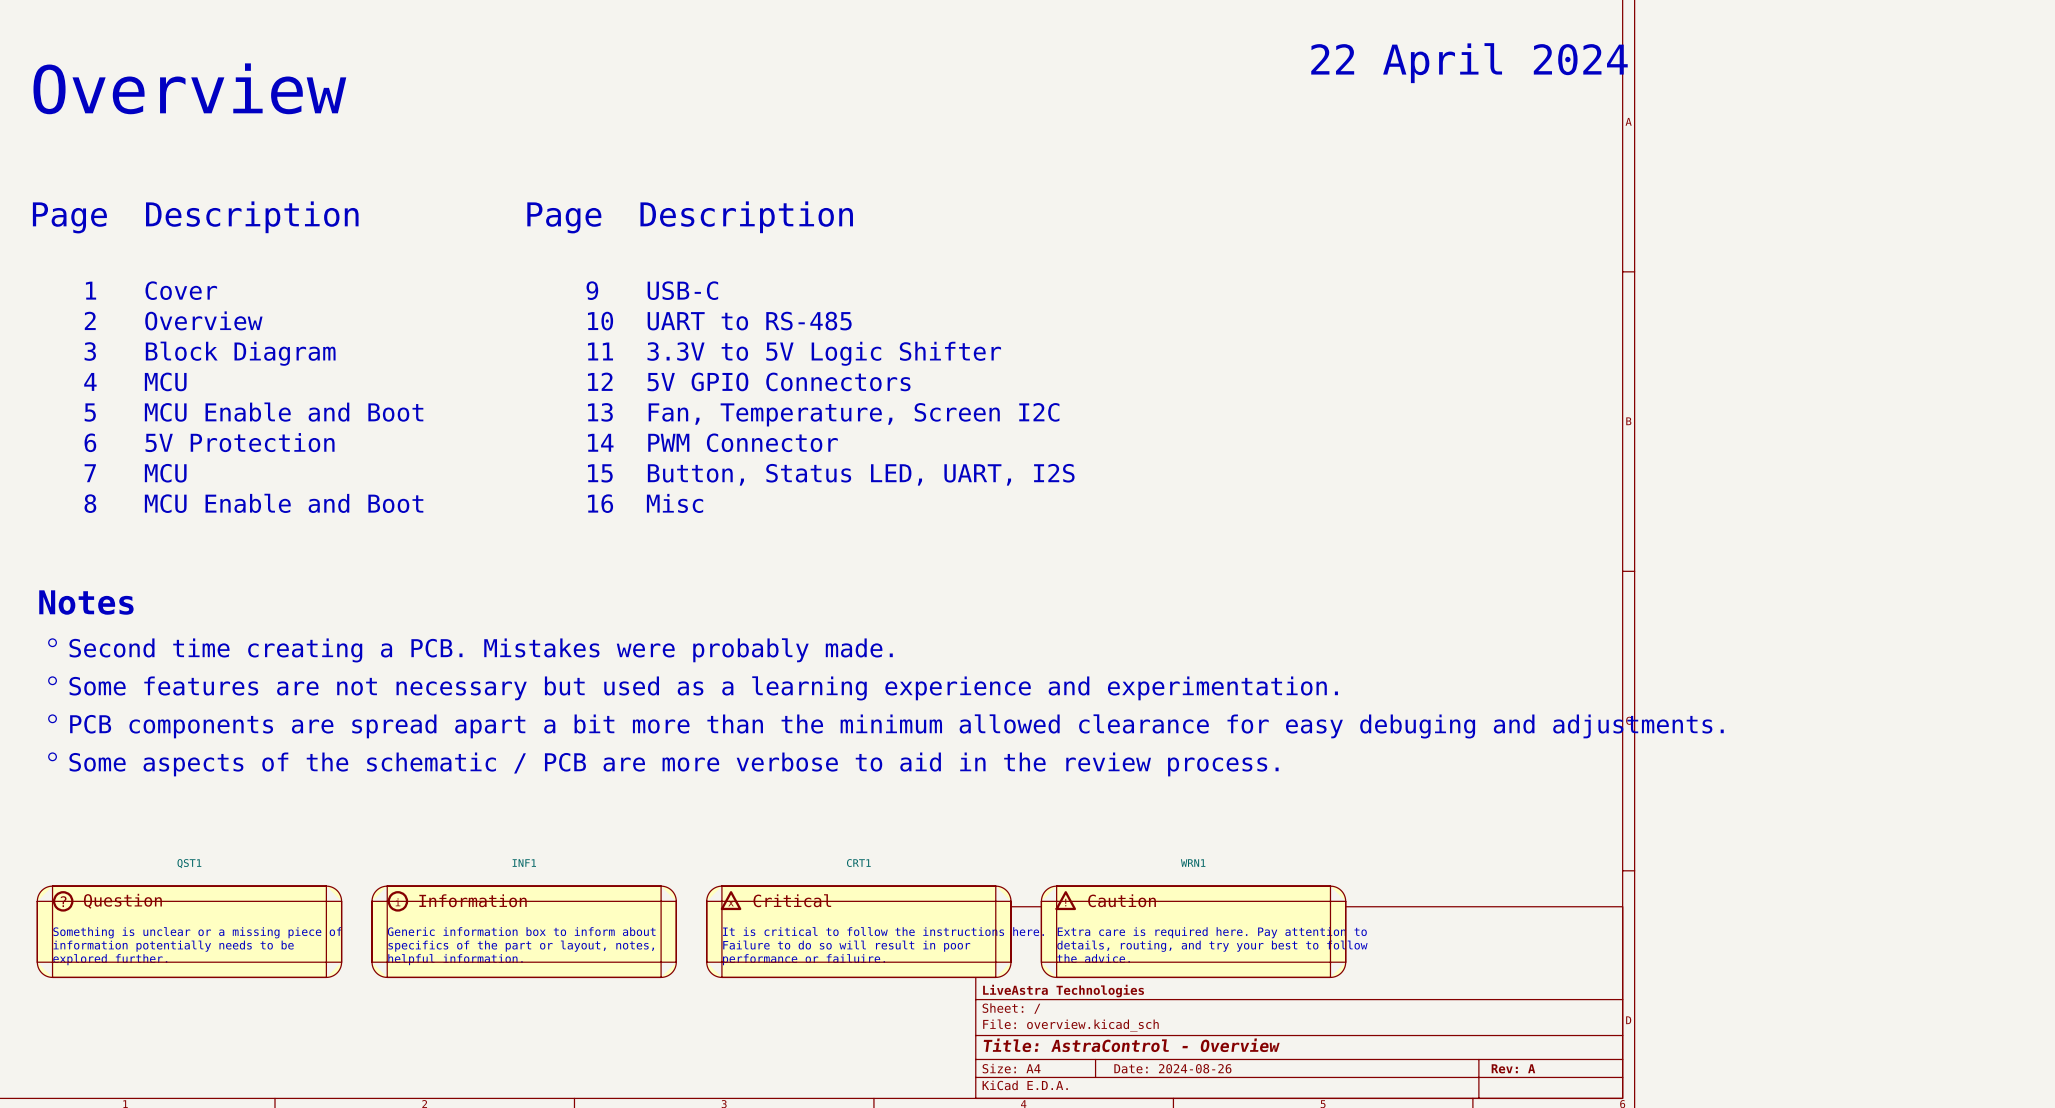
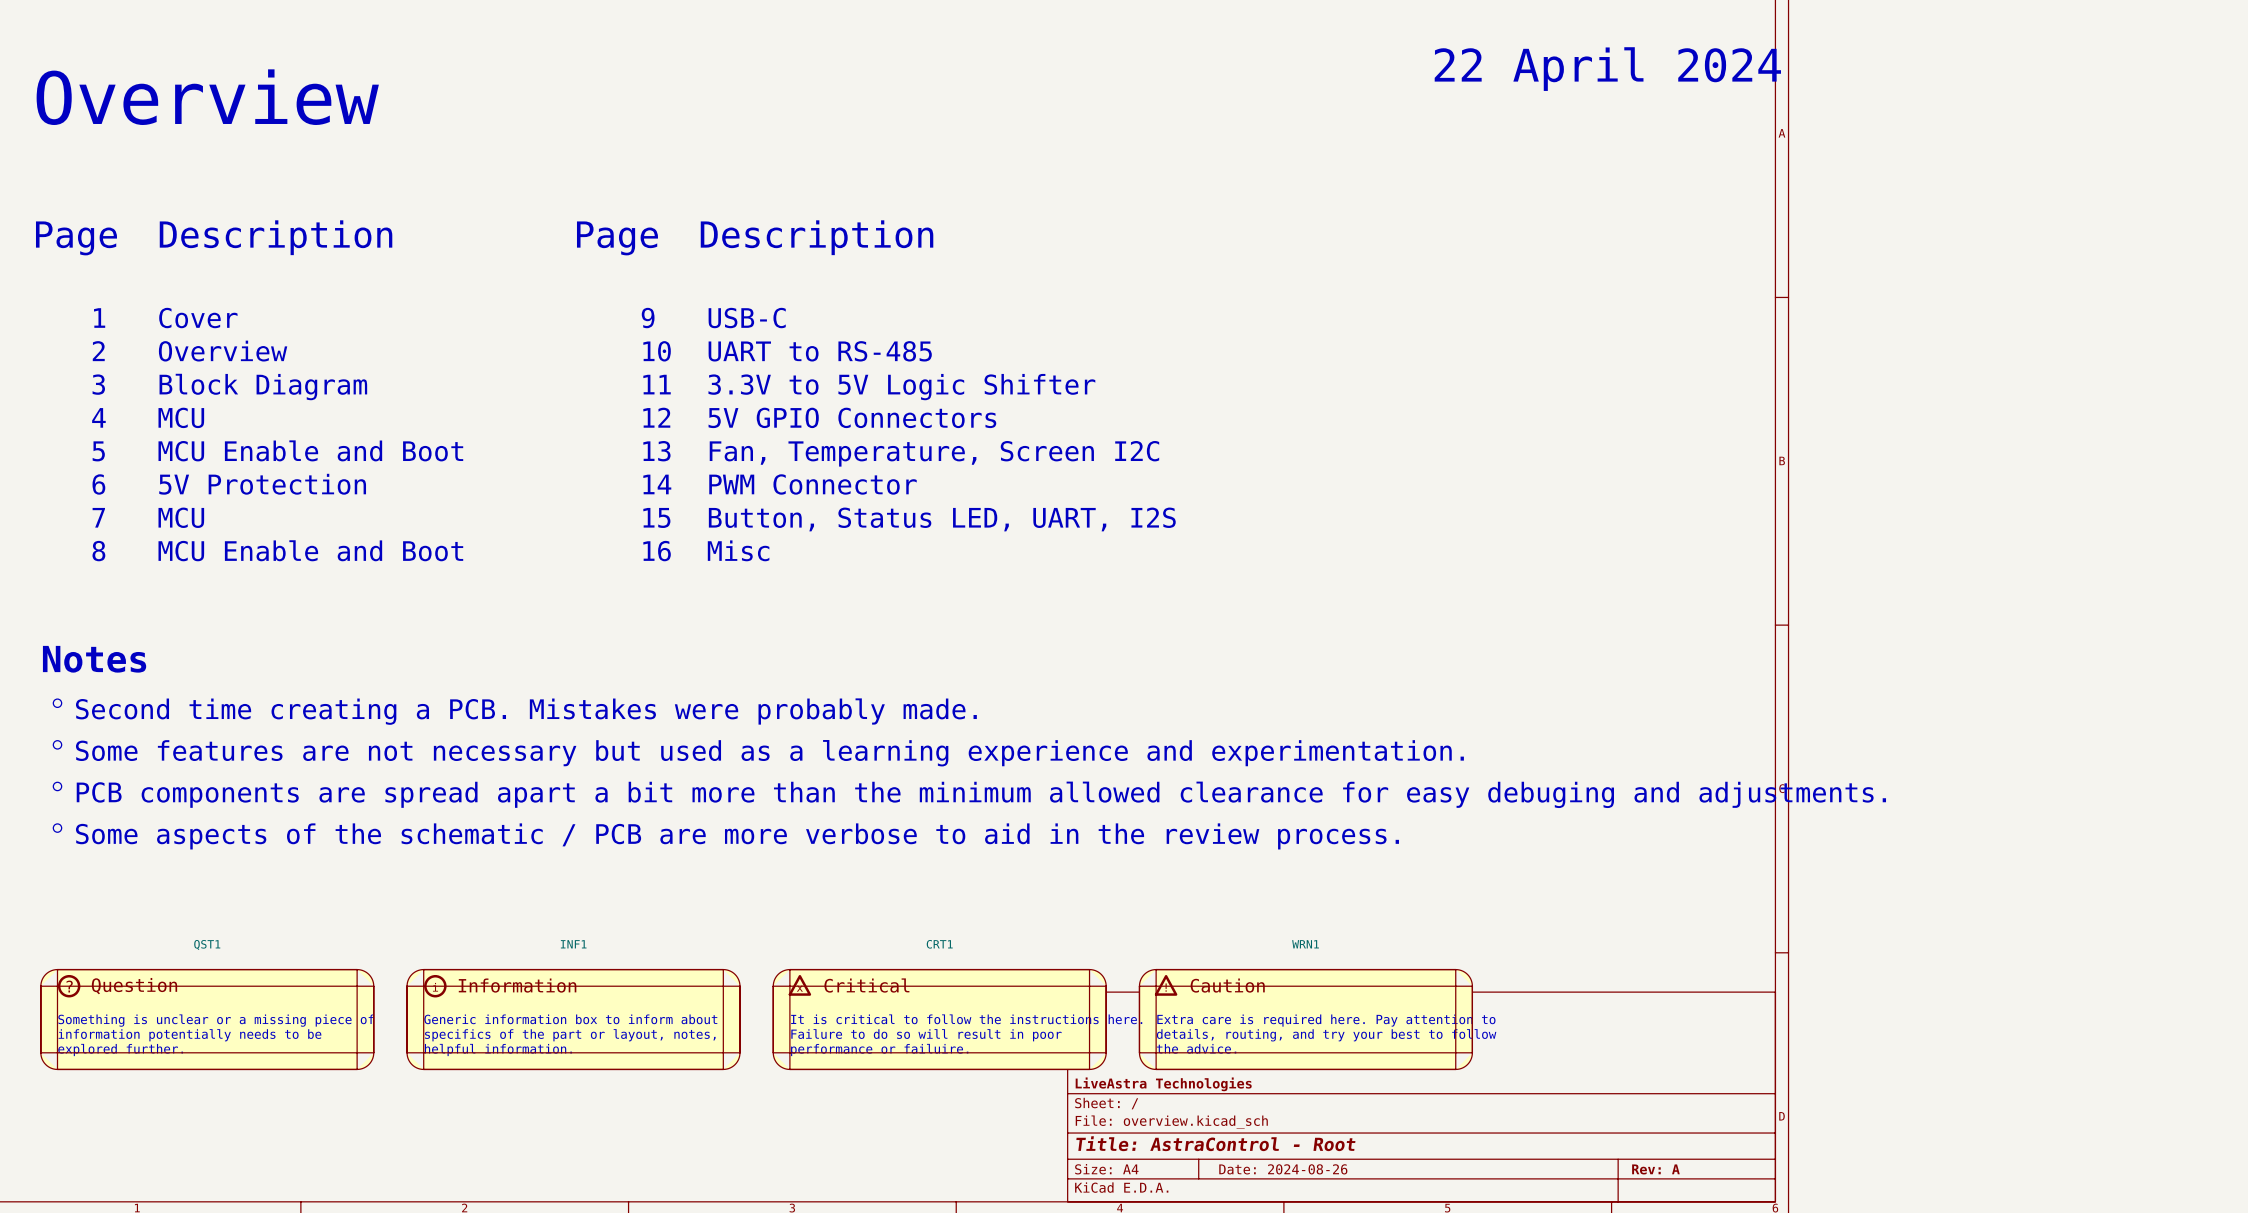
title block: Title: AstraControl - Overview (1131, 1045) -> Title: AstraControl - Root (1215, 1143)

